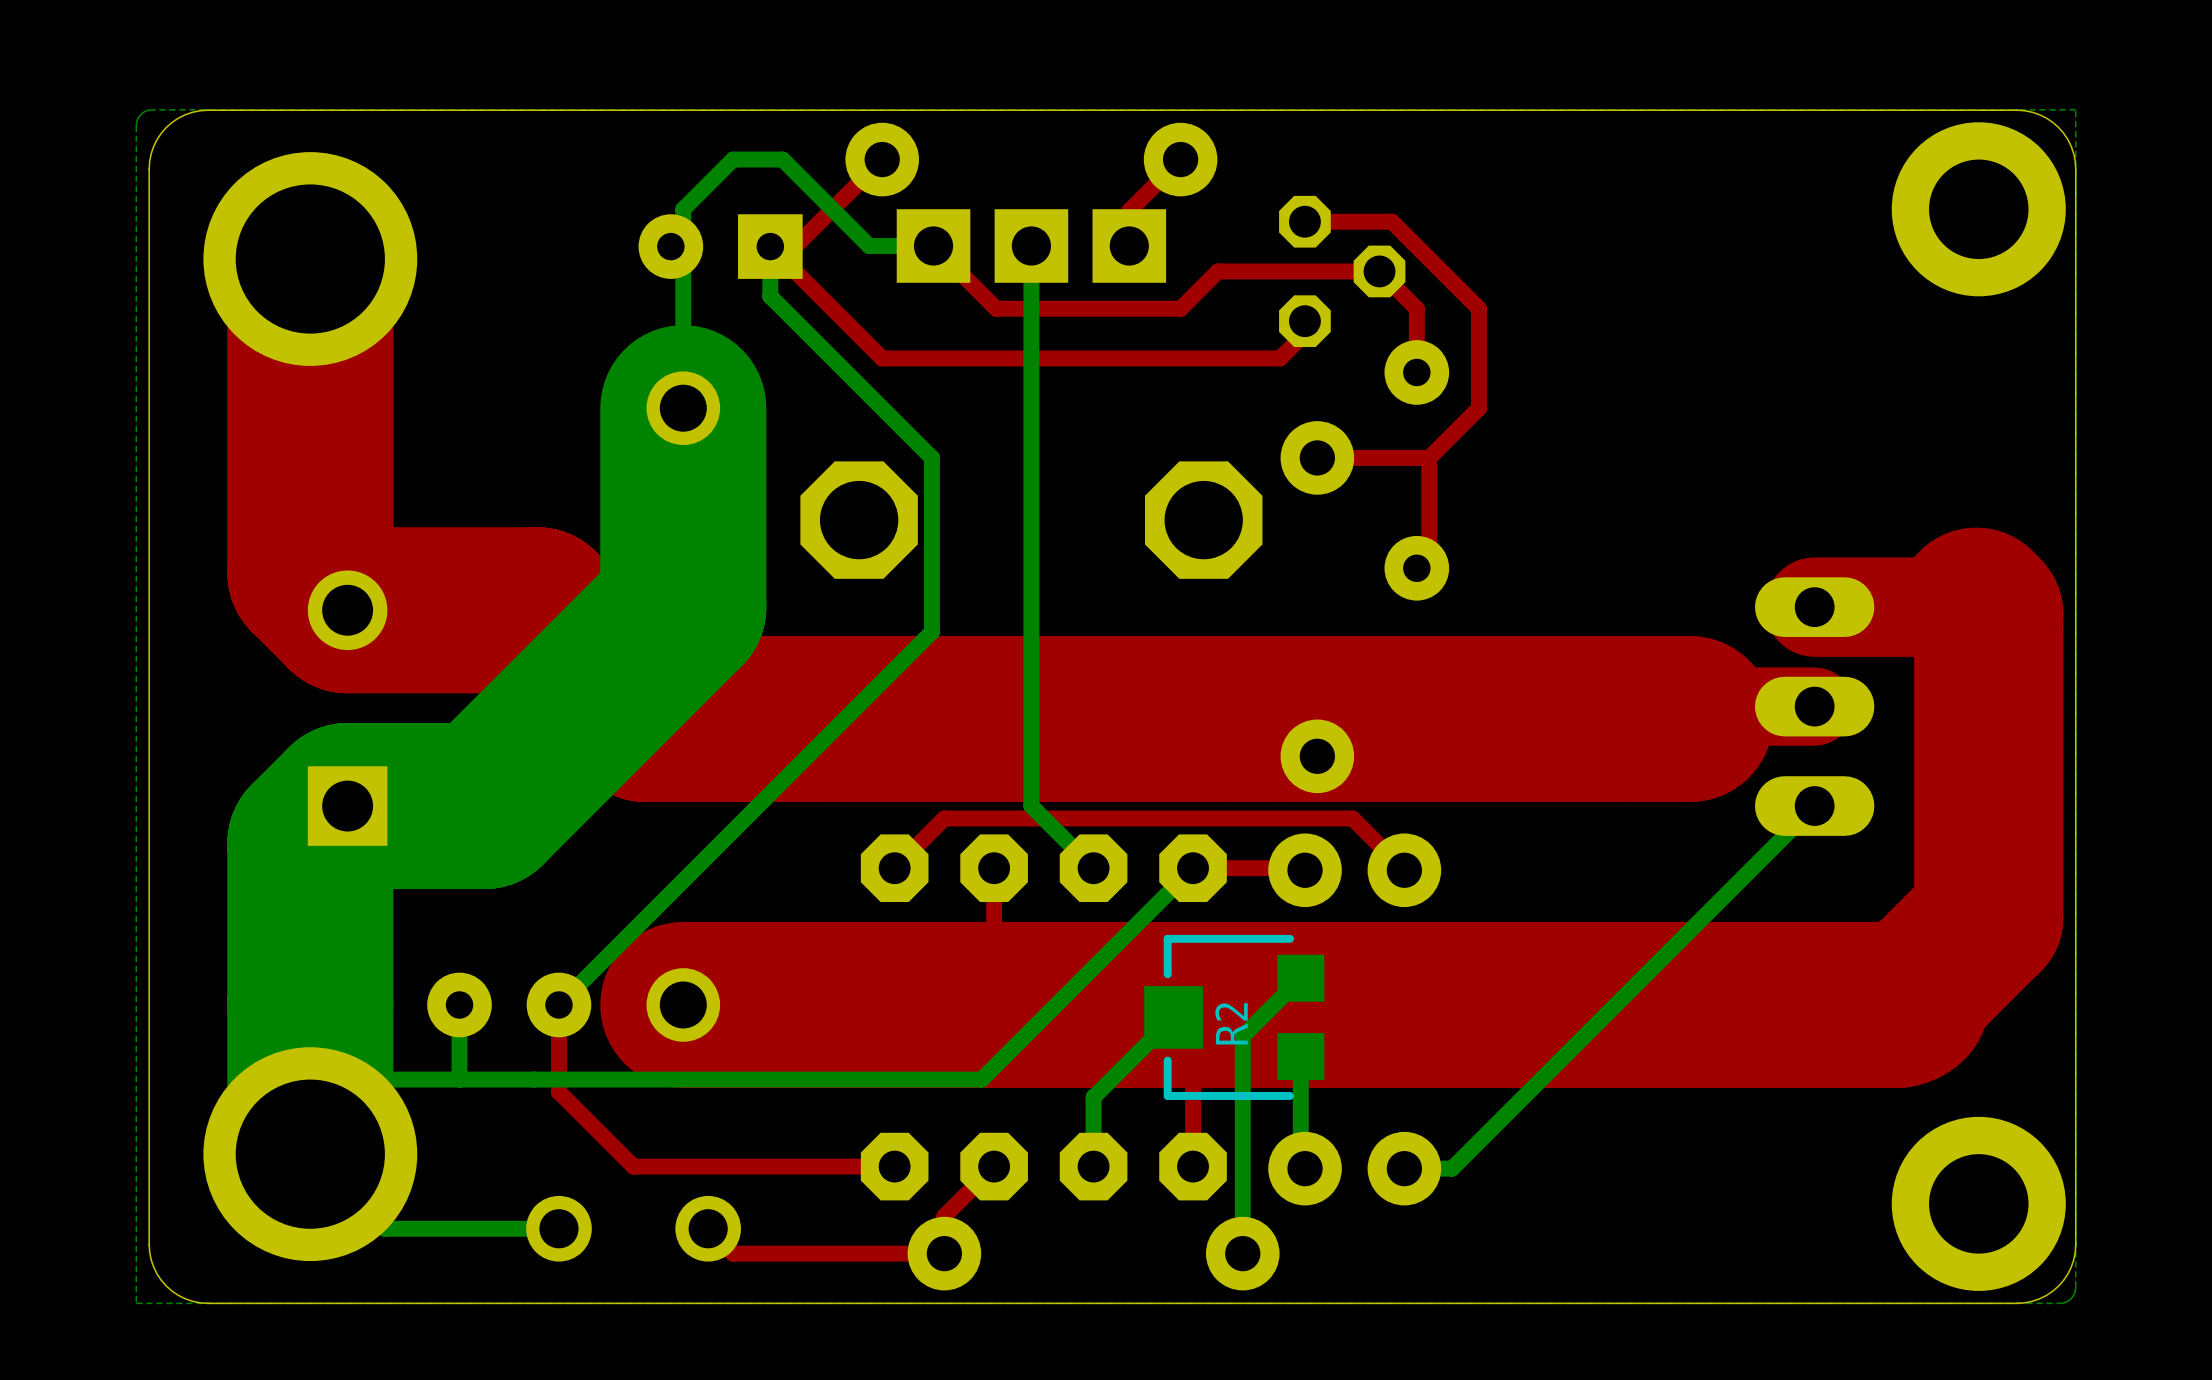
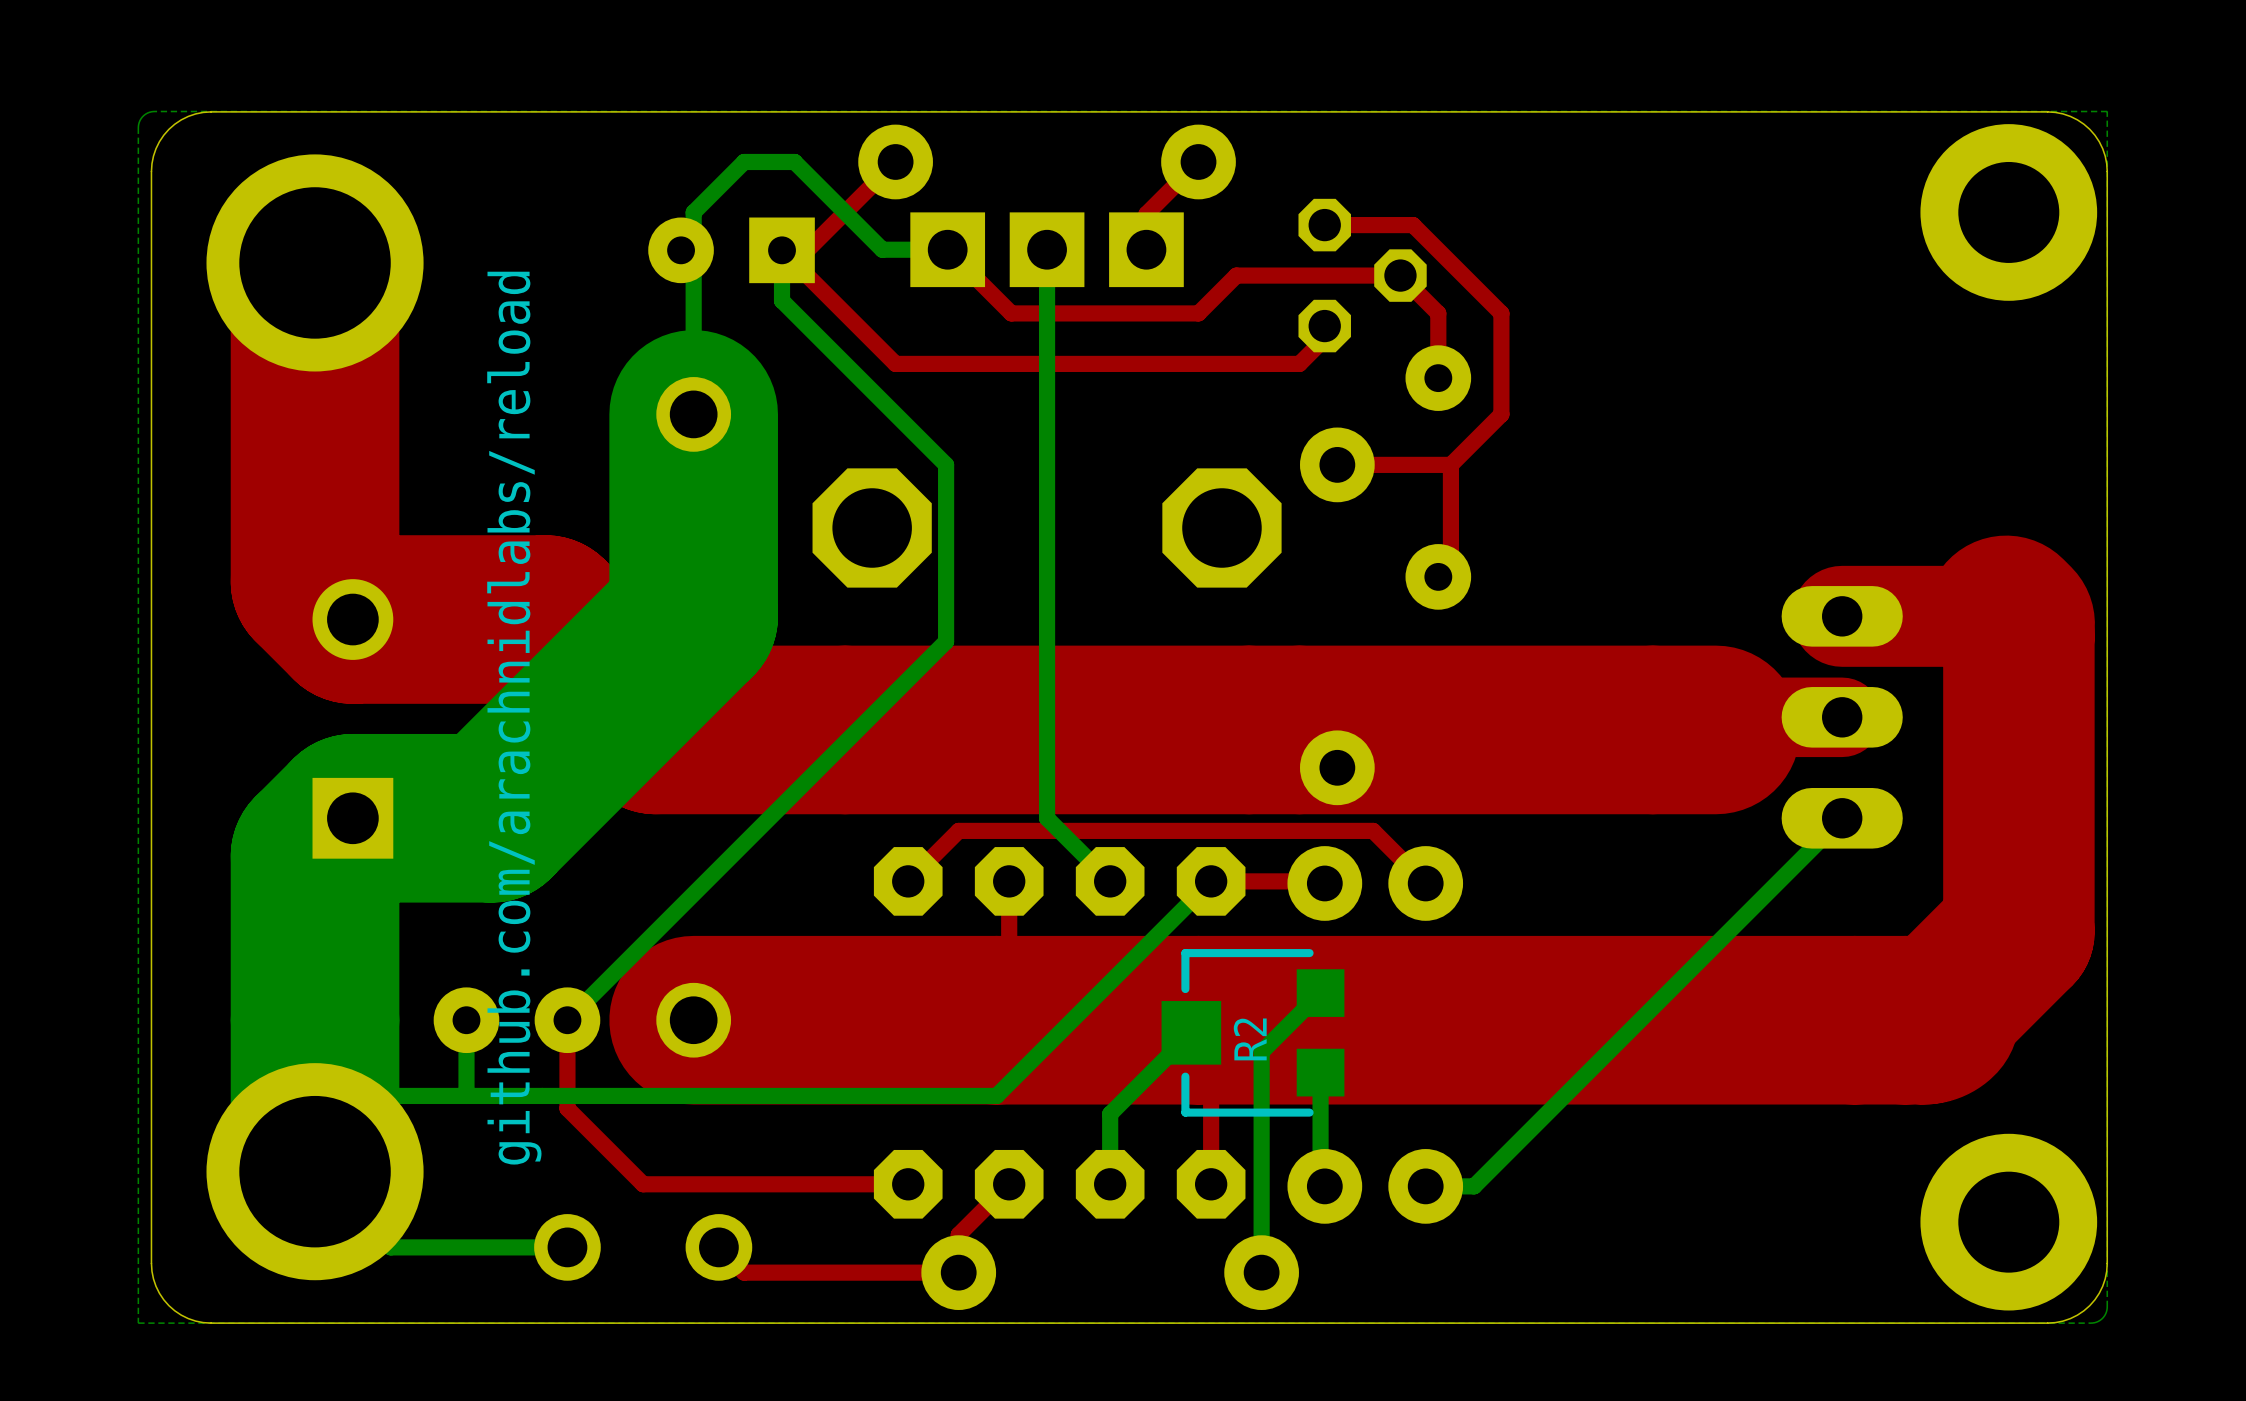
text: none -> github.com/arachnidlabs/reload (514, 718)

